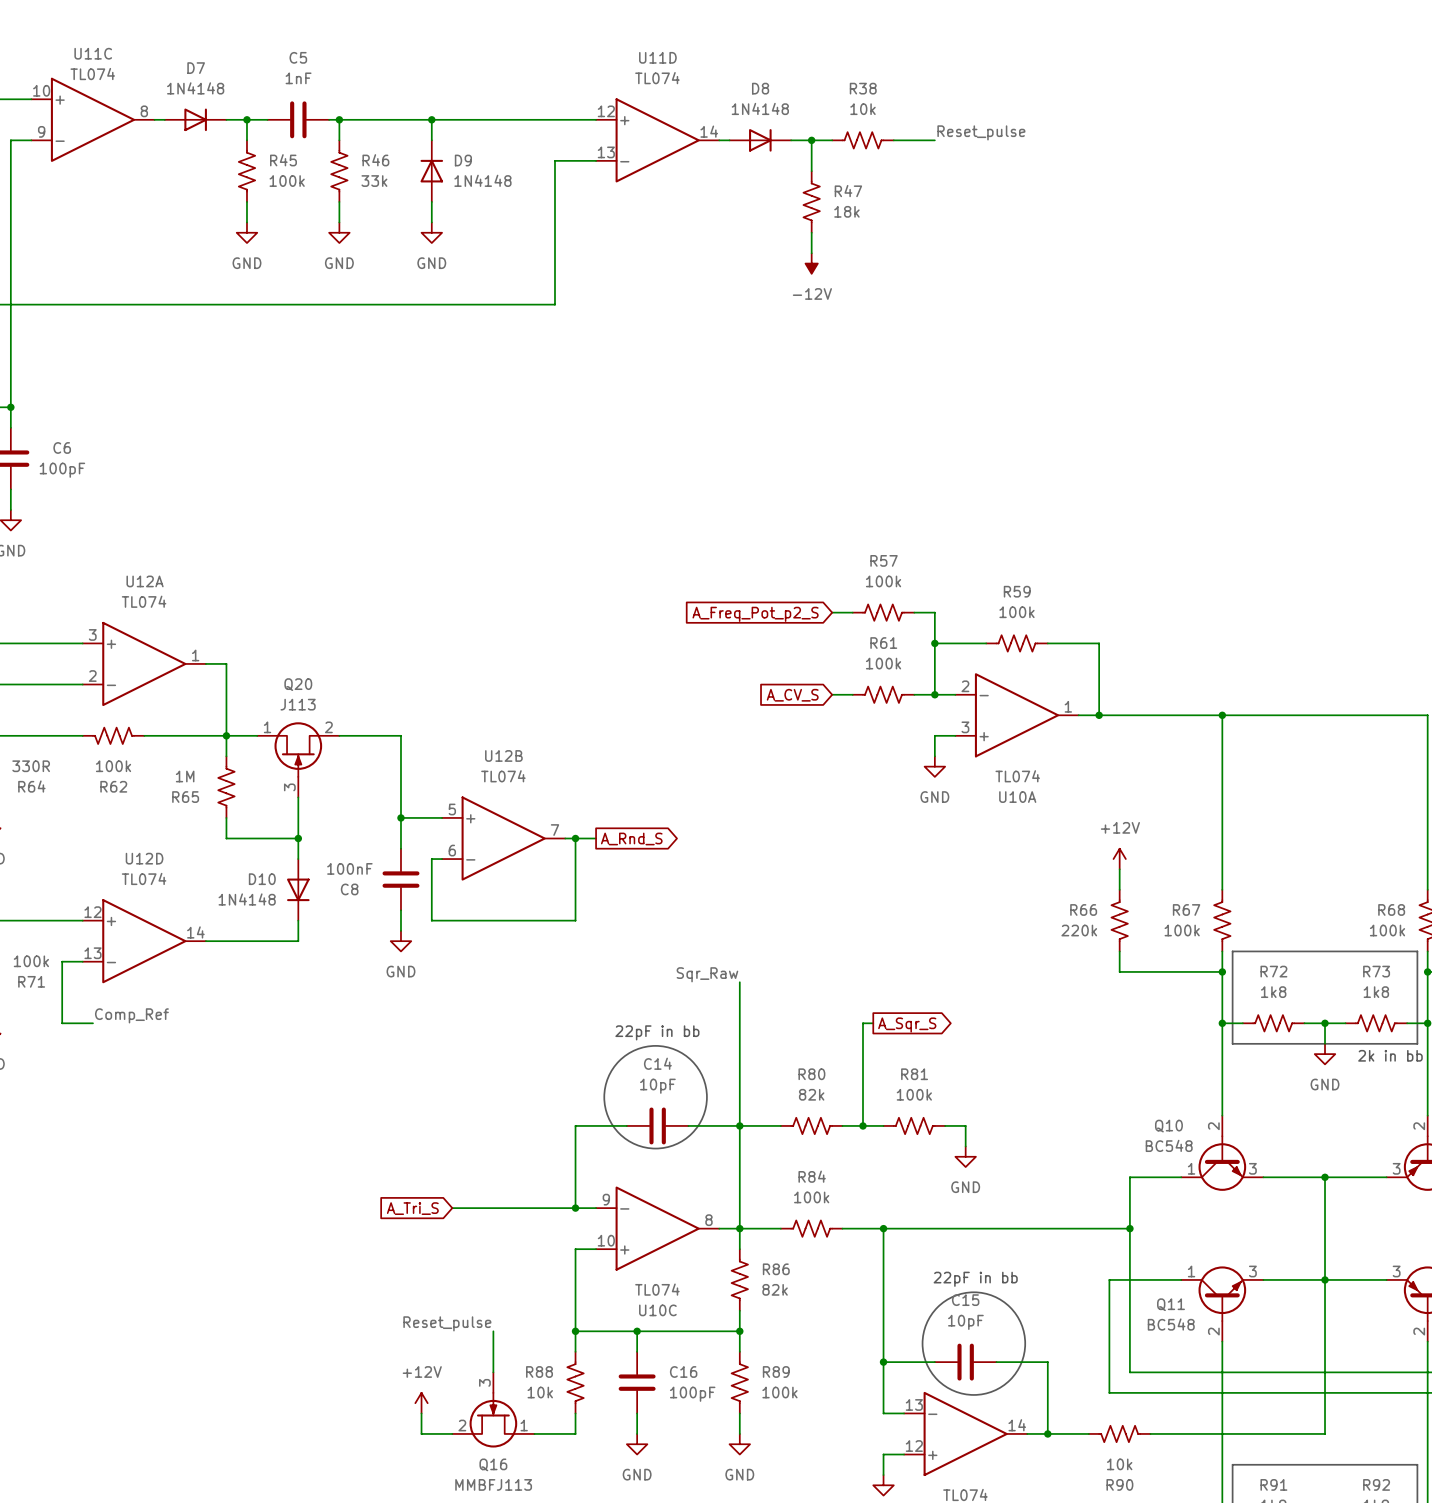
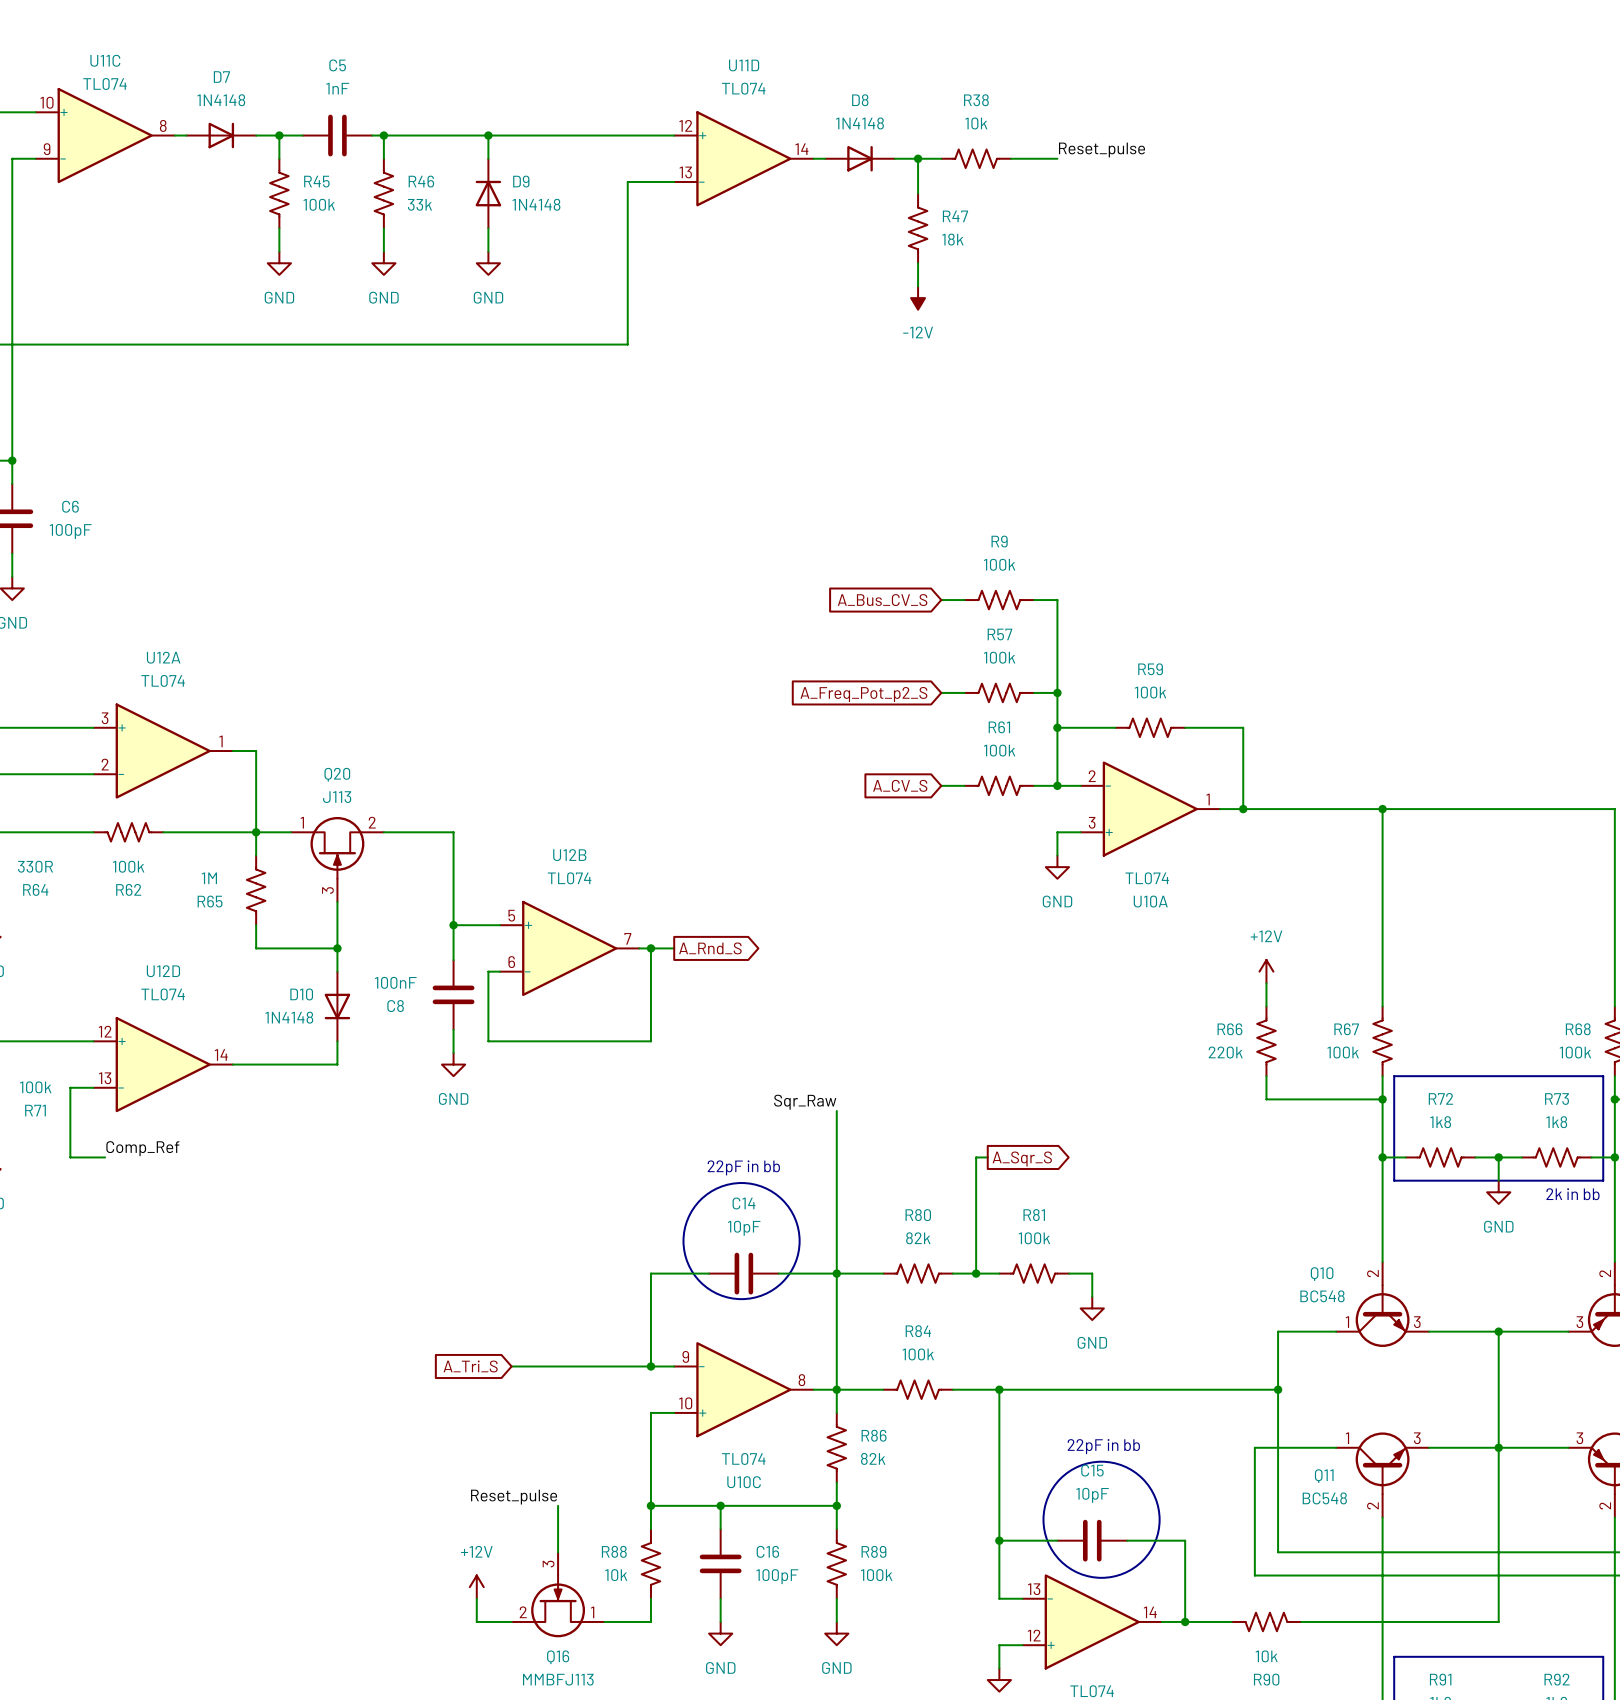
global label: none -> A_Bus_CV_S (882, 600)
wire: none -> (941, 600) (964, 600)
R9: none -> 100k (999, 600)
wire: none -> (1034, 600) (1057, 600) (1057, 692)
junction: none -> (1057, 692)

